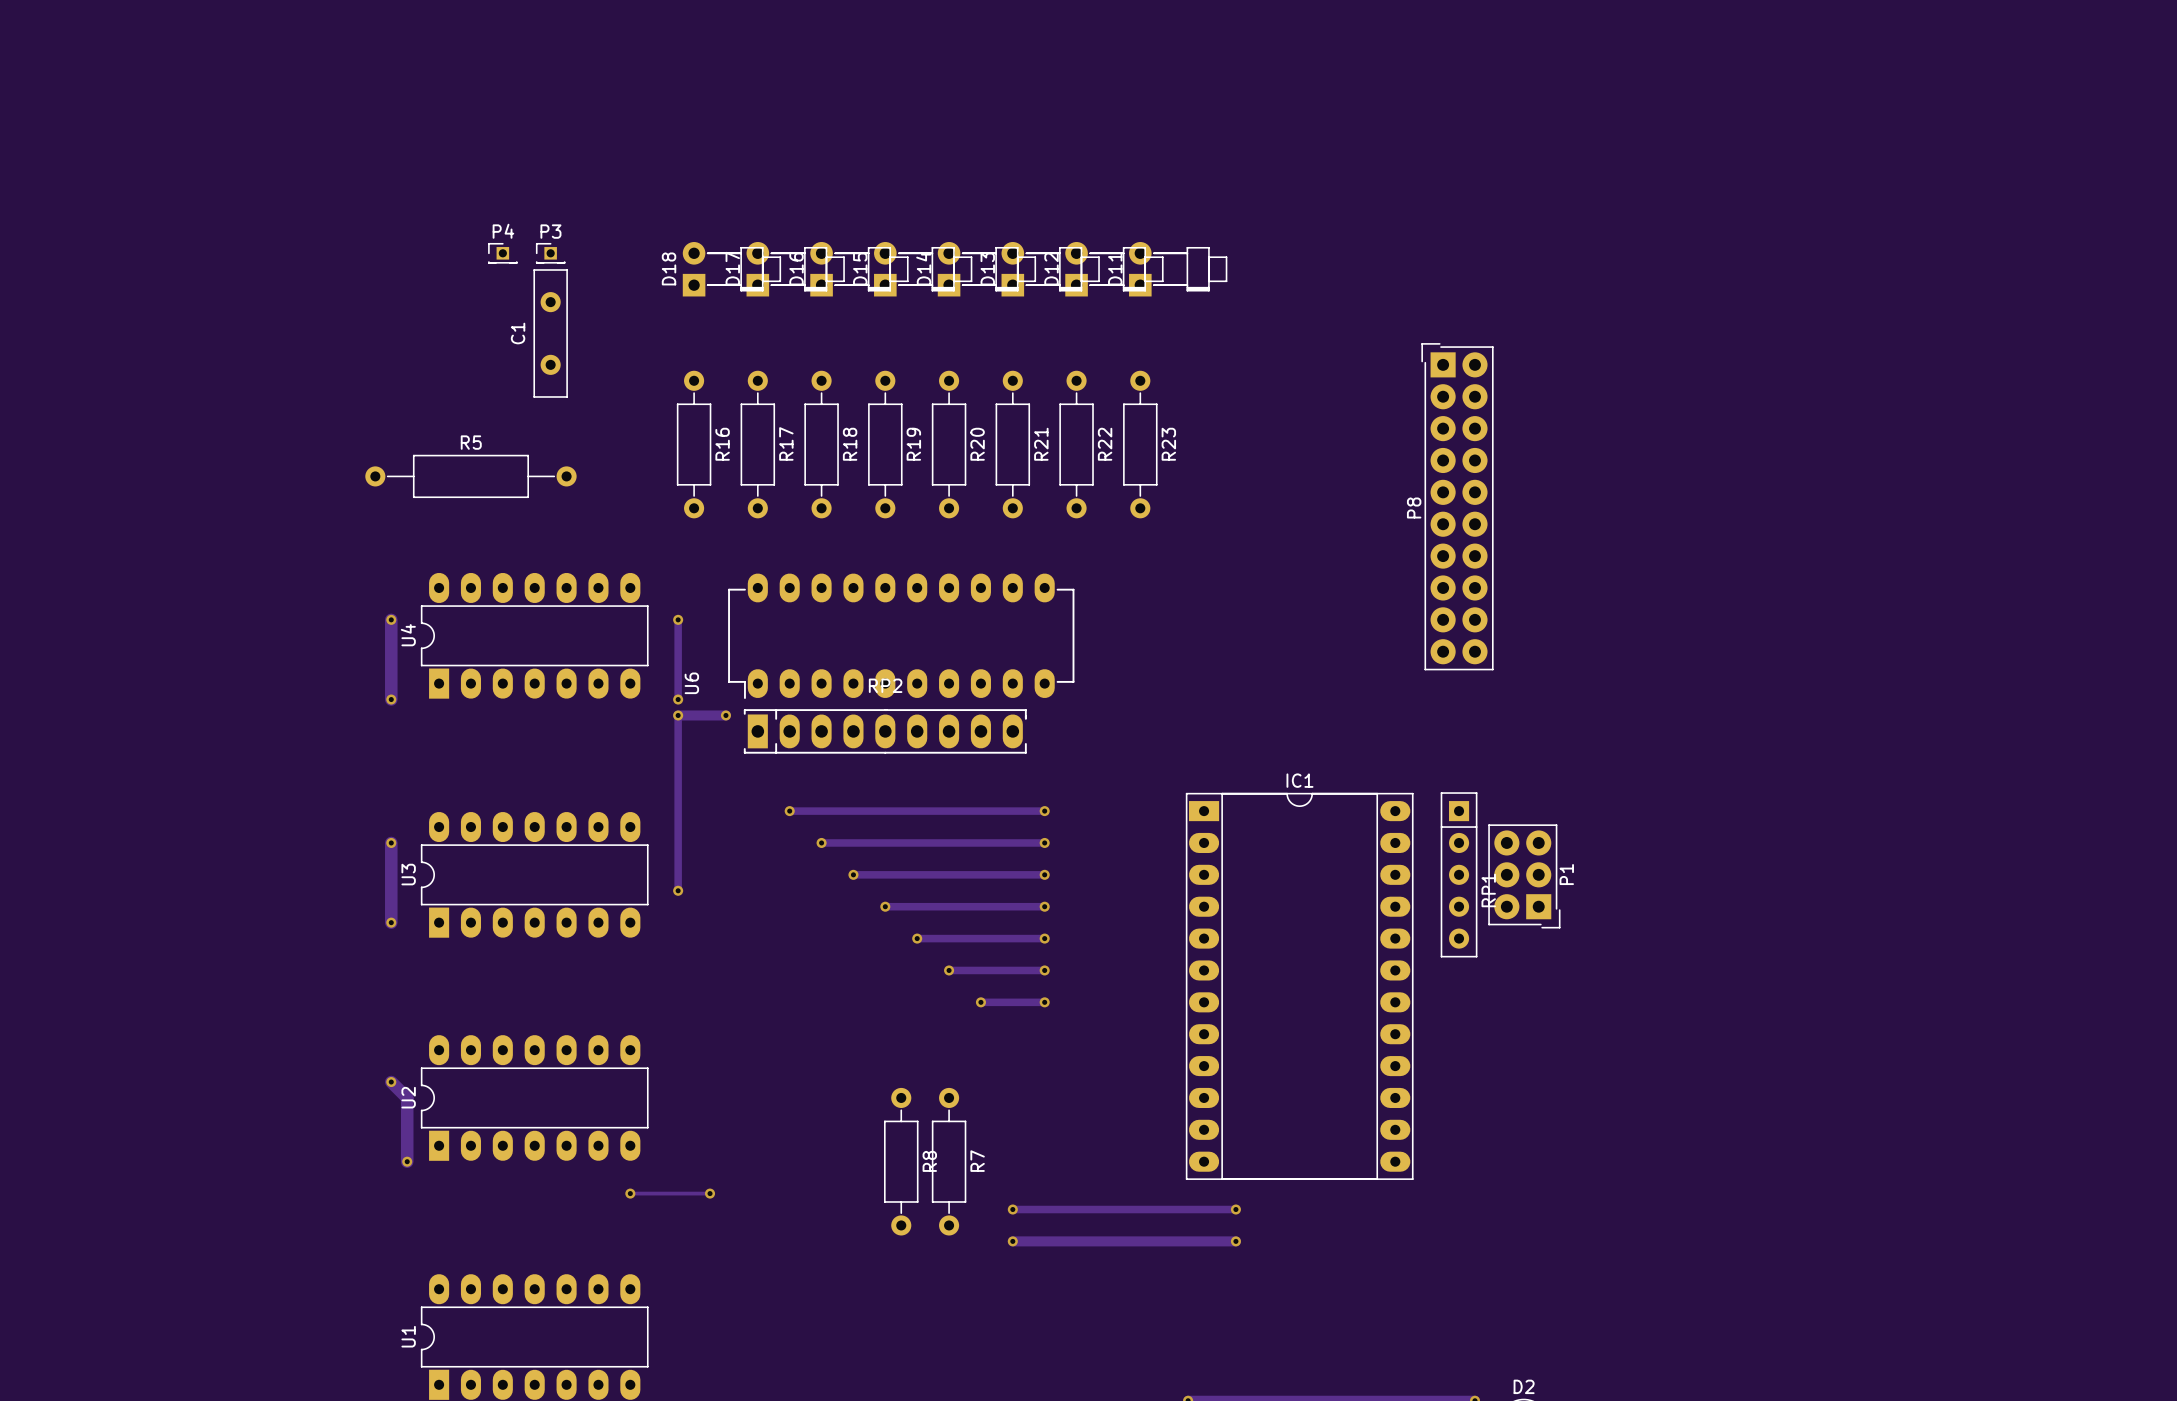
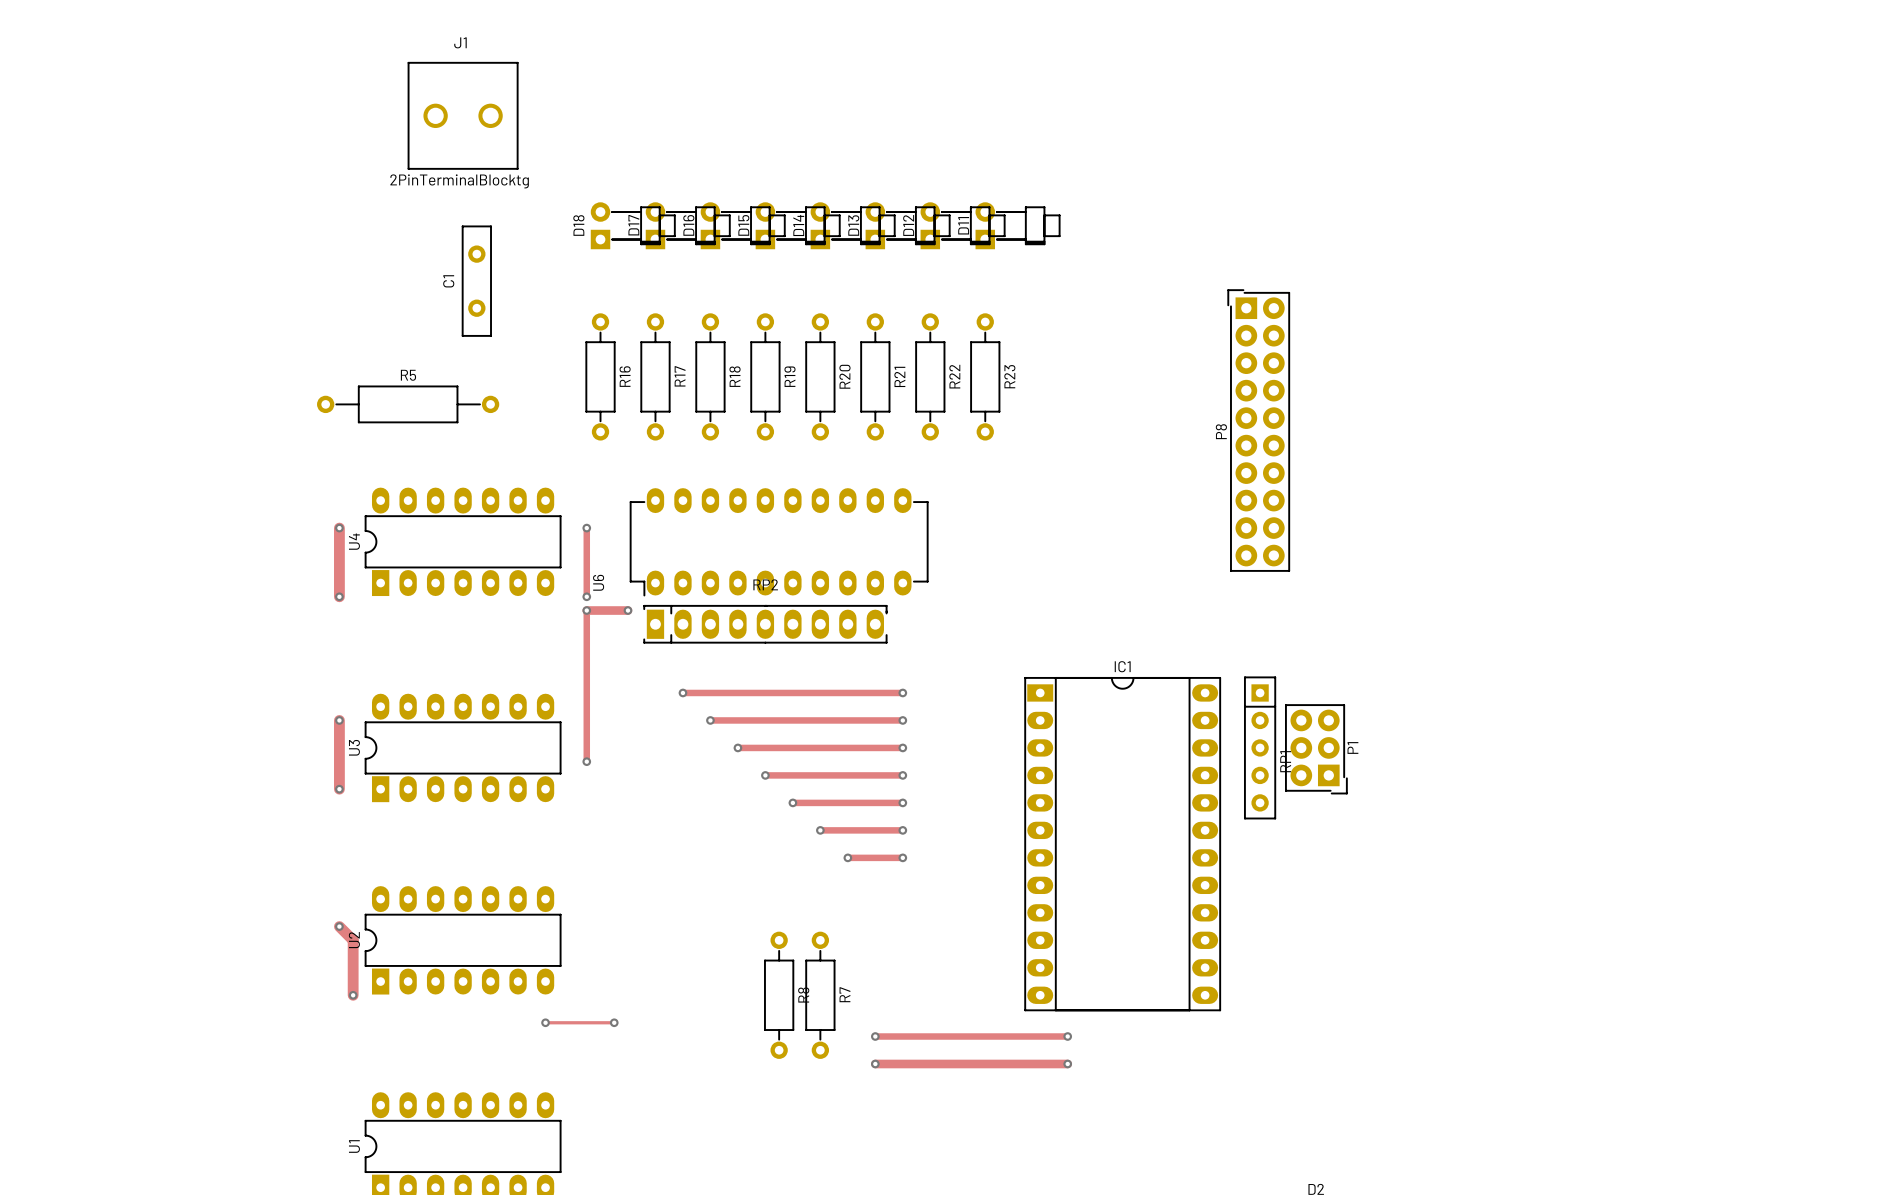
J1: none -> 2PinTerminalBlocktg (463, 115)
P4: (502, 253) -> none
P3: (550, 253) -> none

